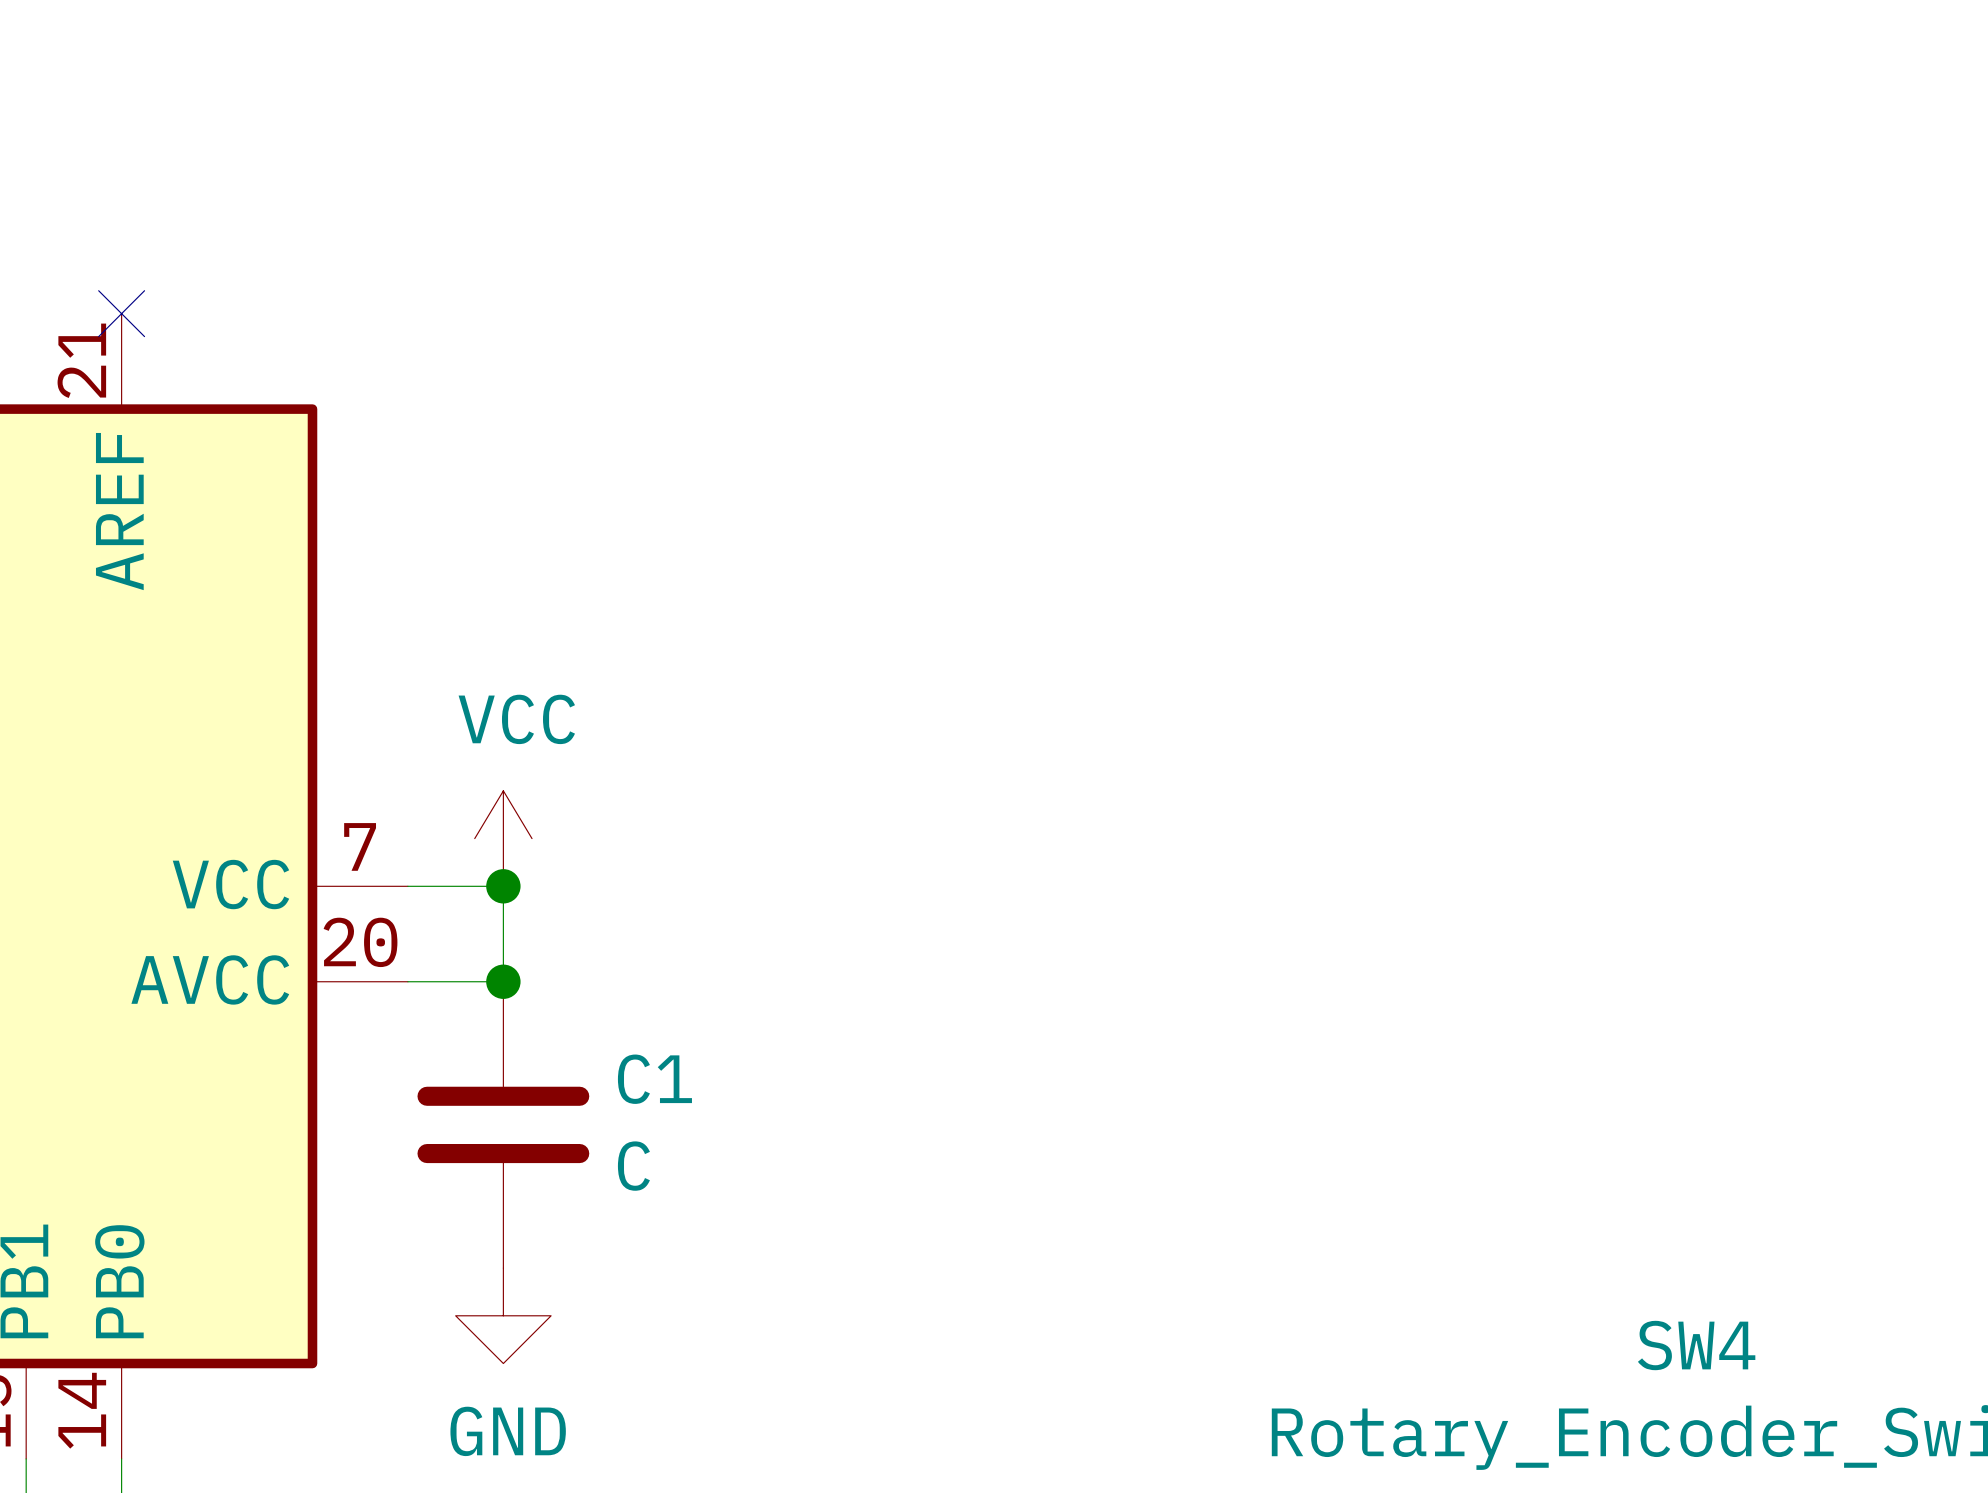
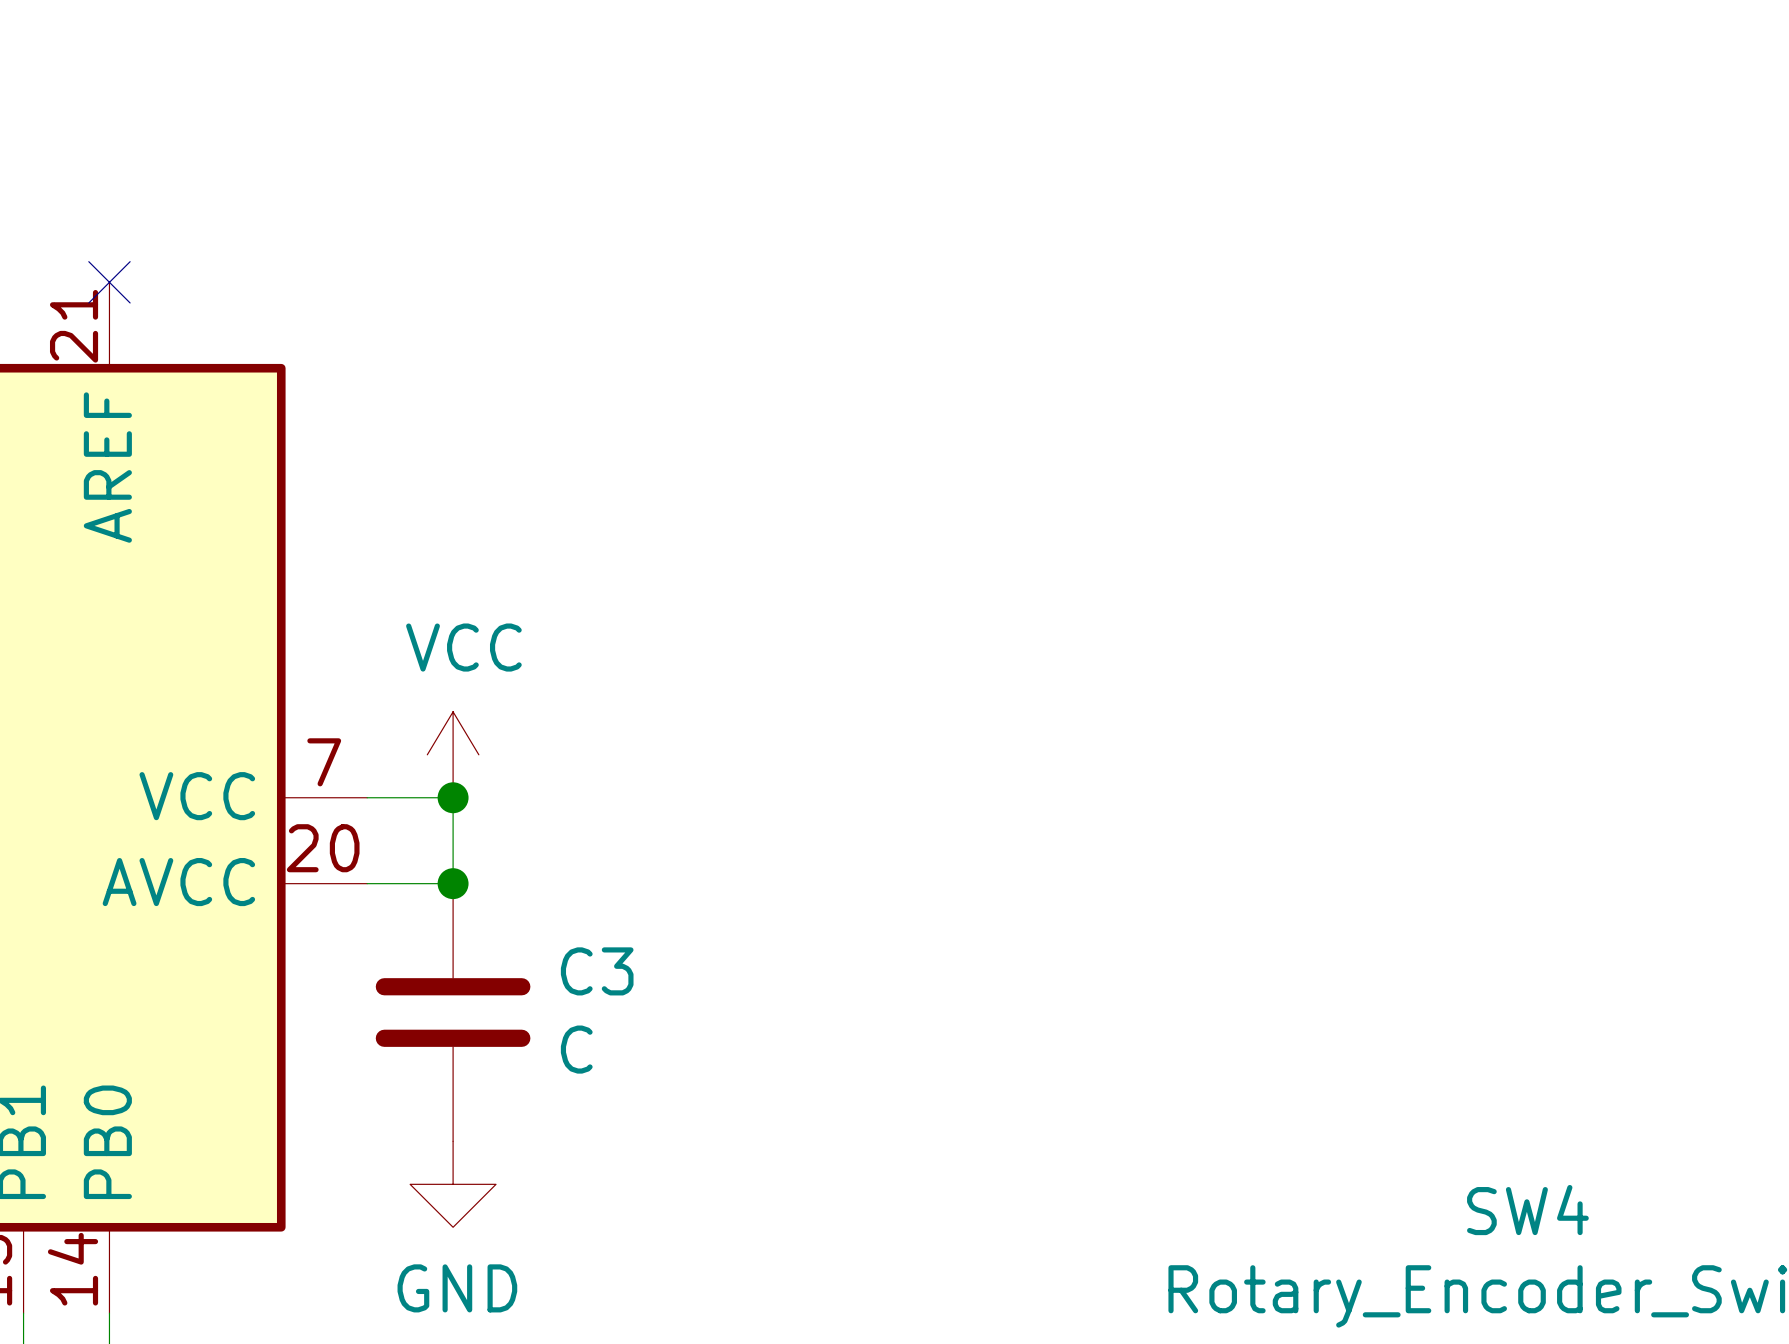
C1 name: C1 (654, 1079) -> C3 (597, 971)

